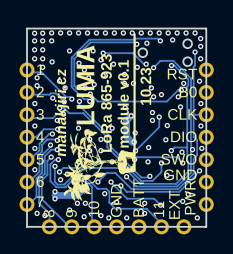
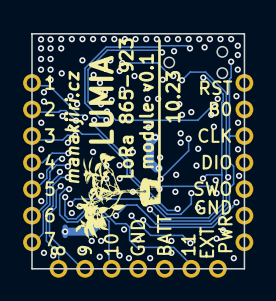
via: (54, 191) -> none
via: none -> (65, 231)
via: (55, 198) -> none

